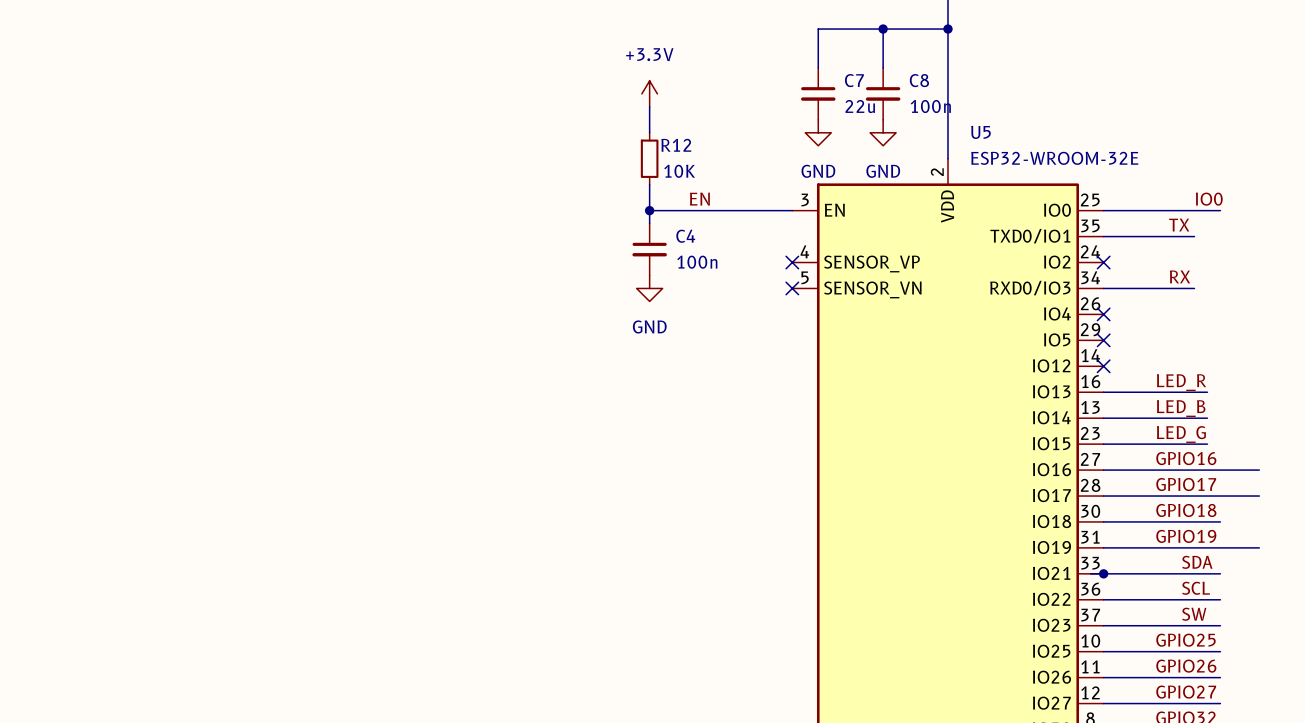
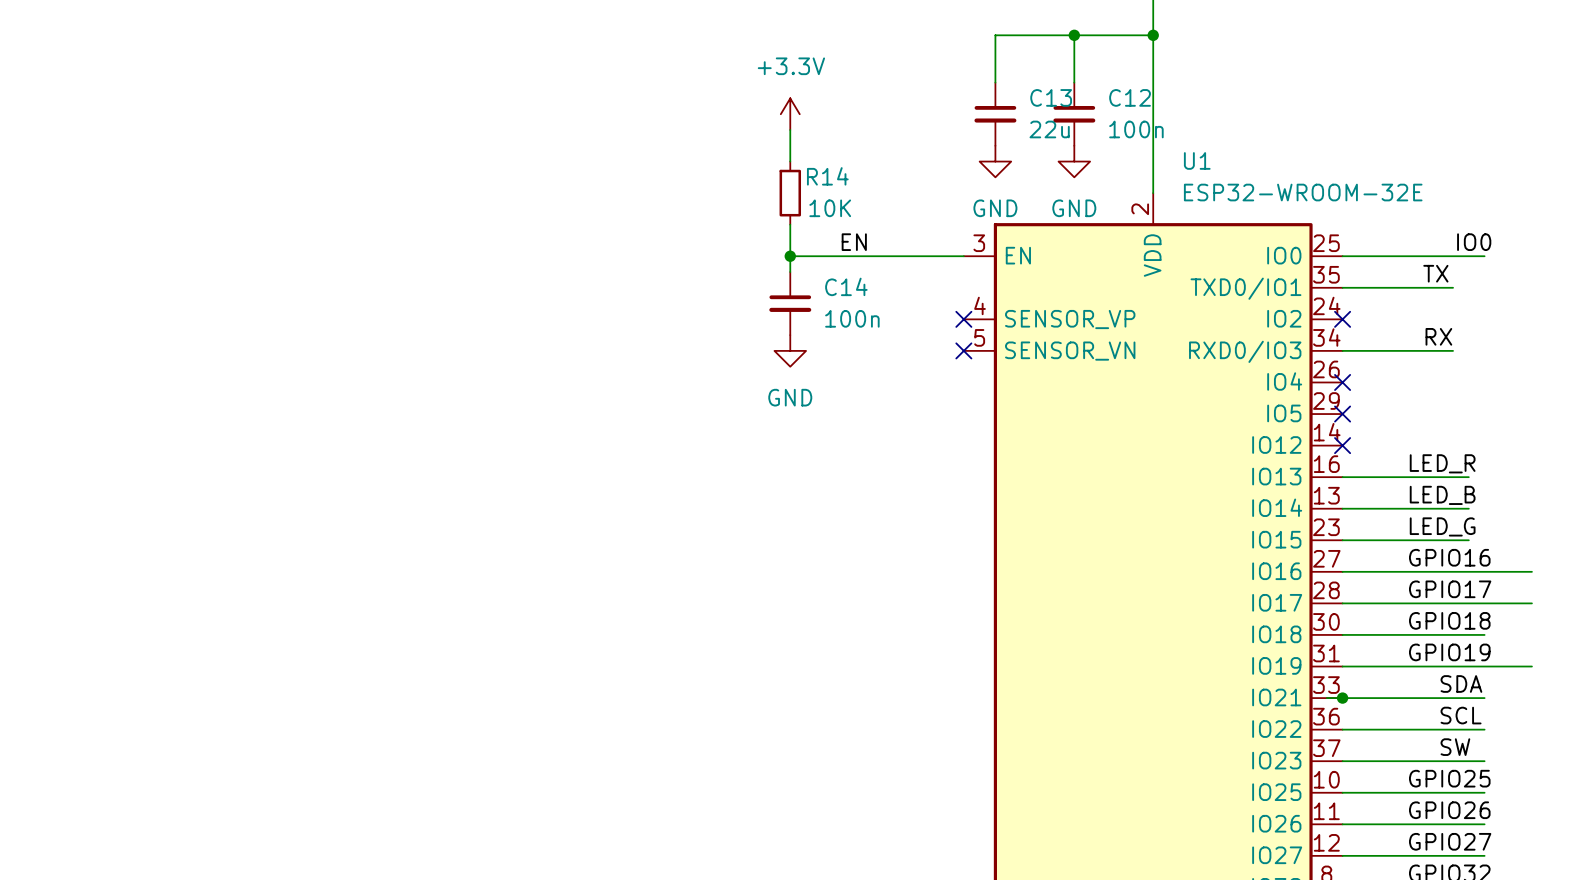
C7 name: C7 (854, 80) -> C13 (1051, 97)
C8 name: C8 (919, 80) -> C12 (1130, 97)
U5 name: U5 (980, 132) -> U1 (1197, 160)
R12 name: R12 (676, 145) -> R14 (827, 176)
C4 name: C4 (685, 236) -> C14 (846, 286)

